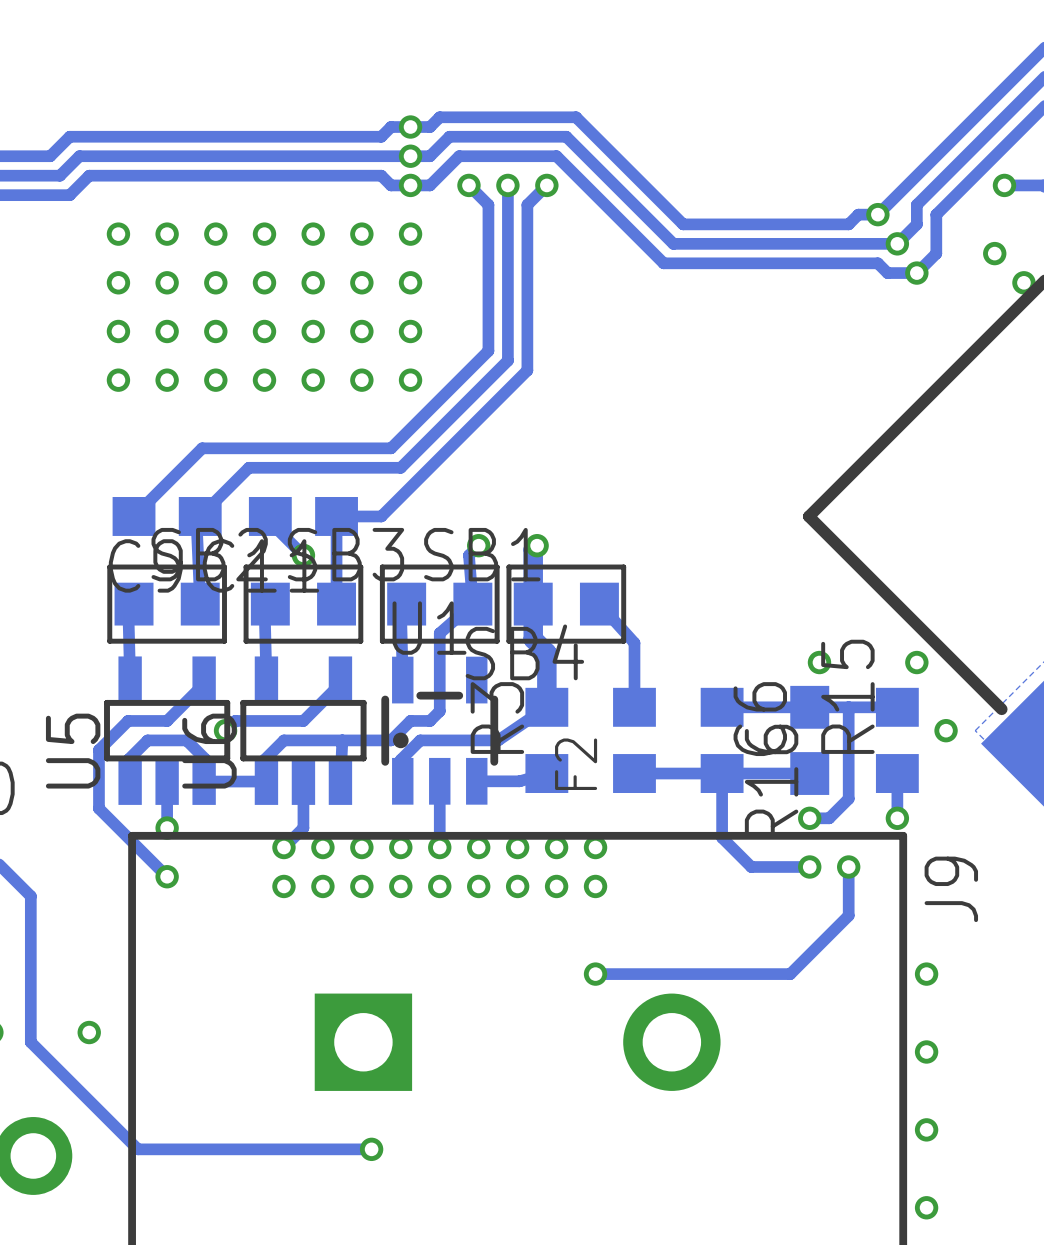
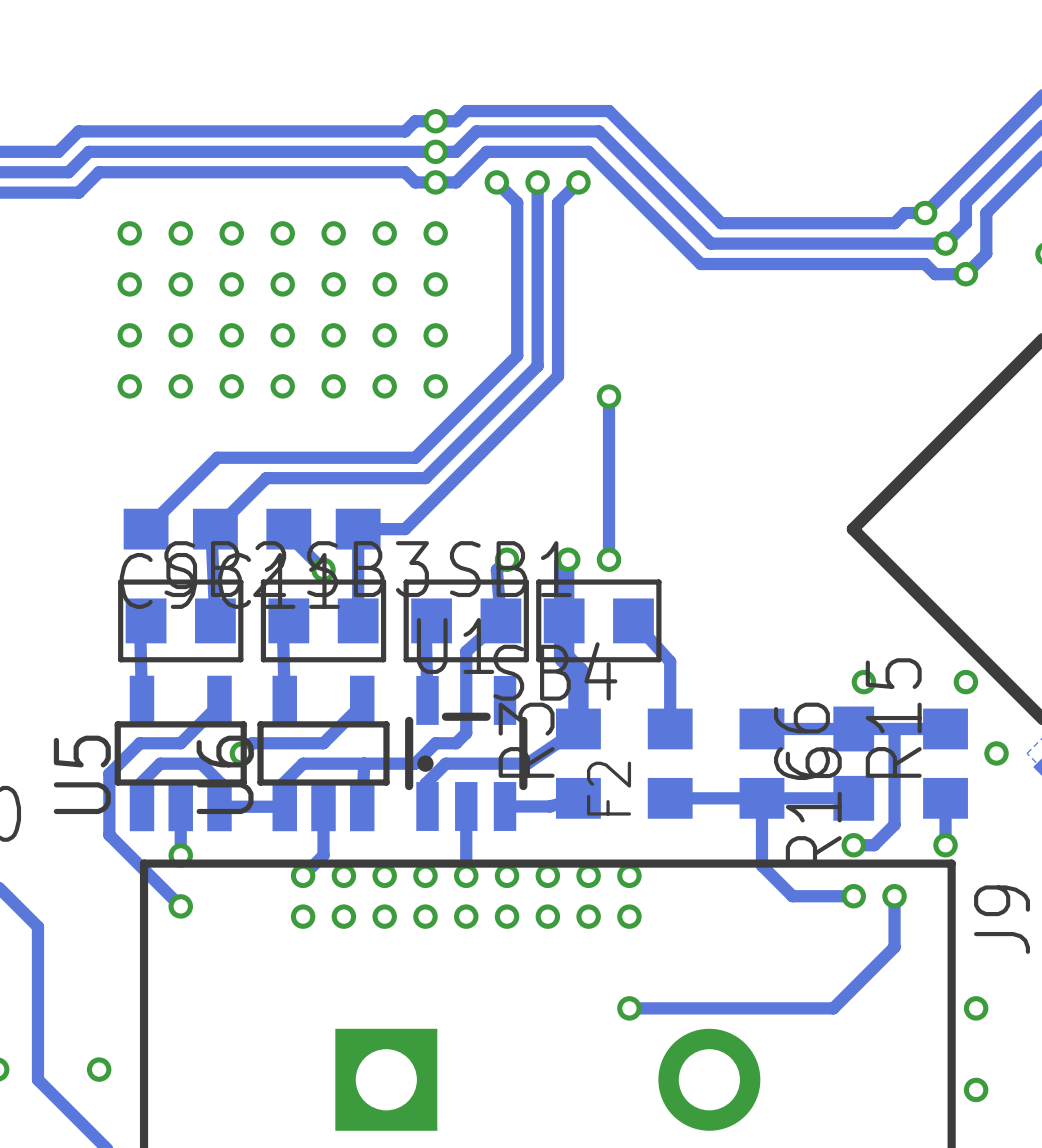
track: none -> (609, 396) (609, 559)
via: none -> (609, 396)
via: none -> (609, 559)

